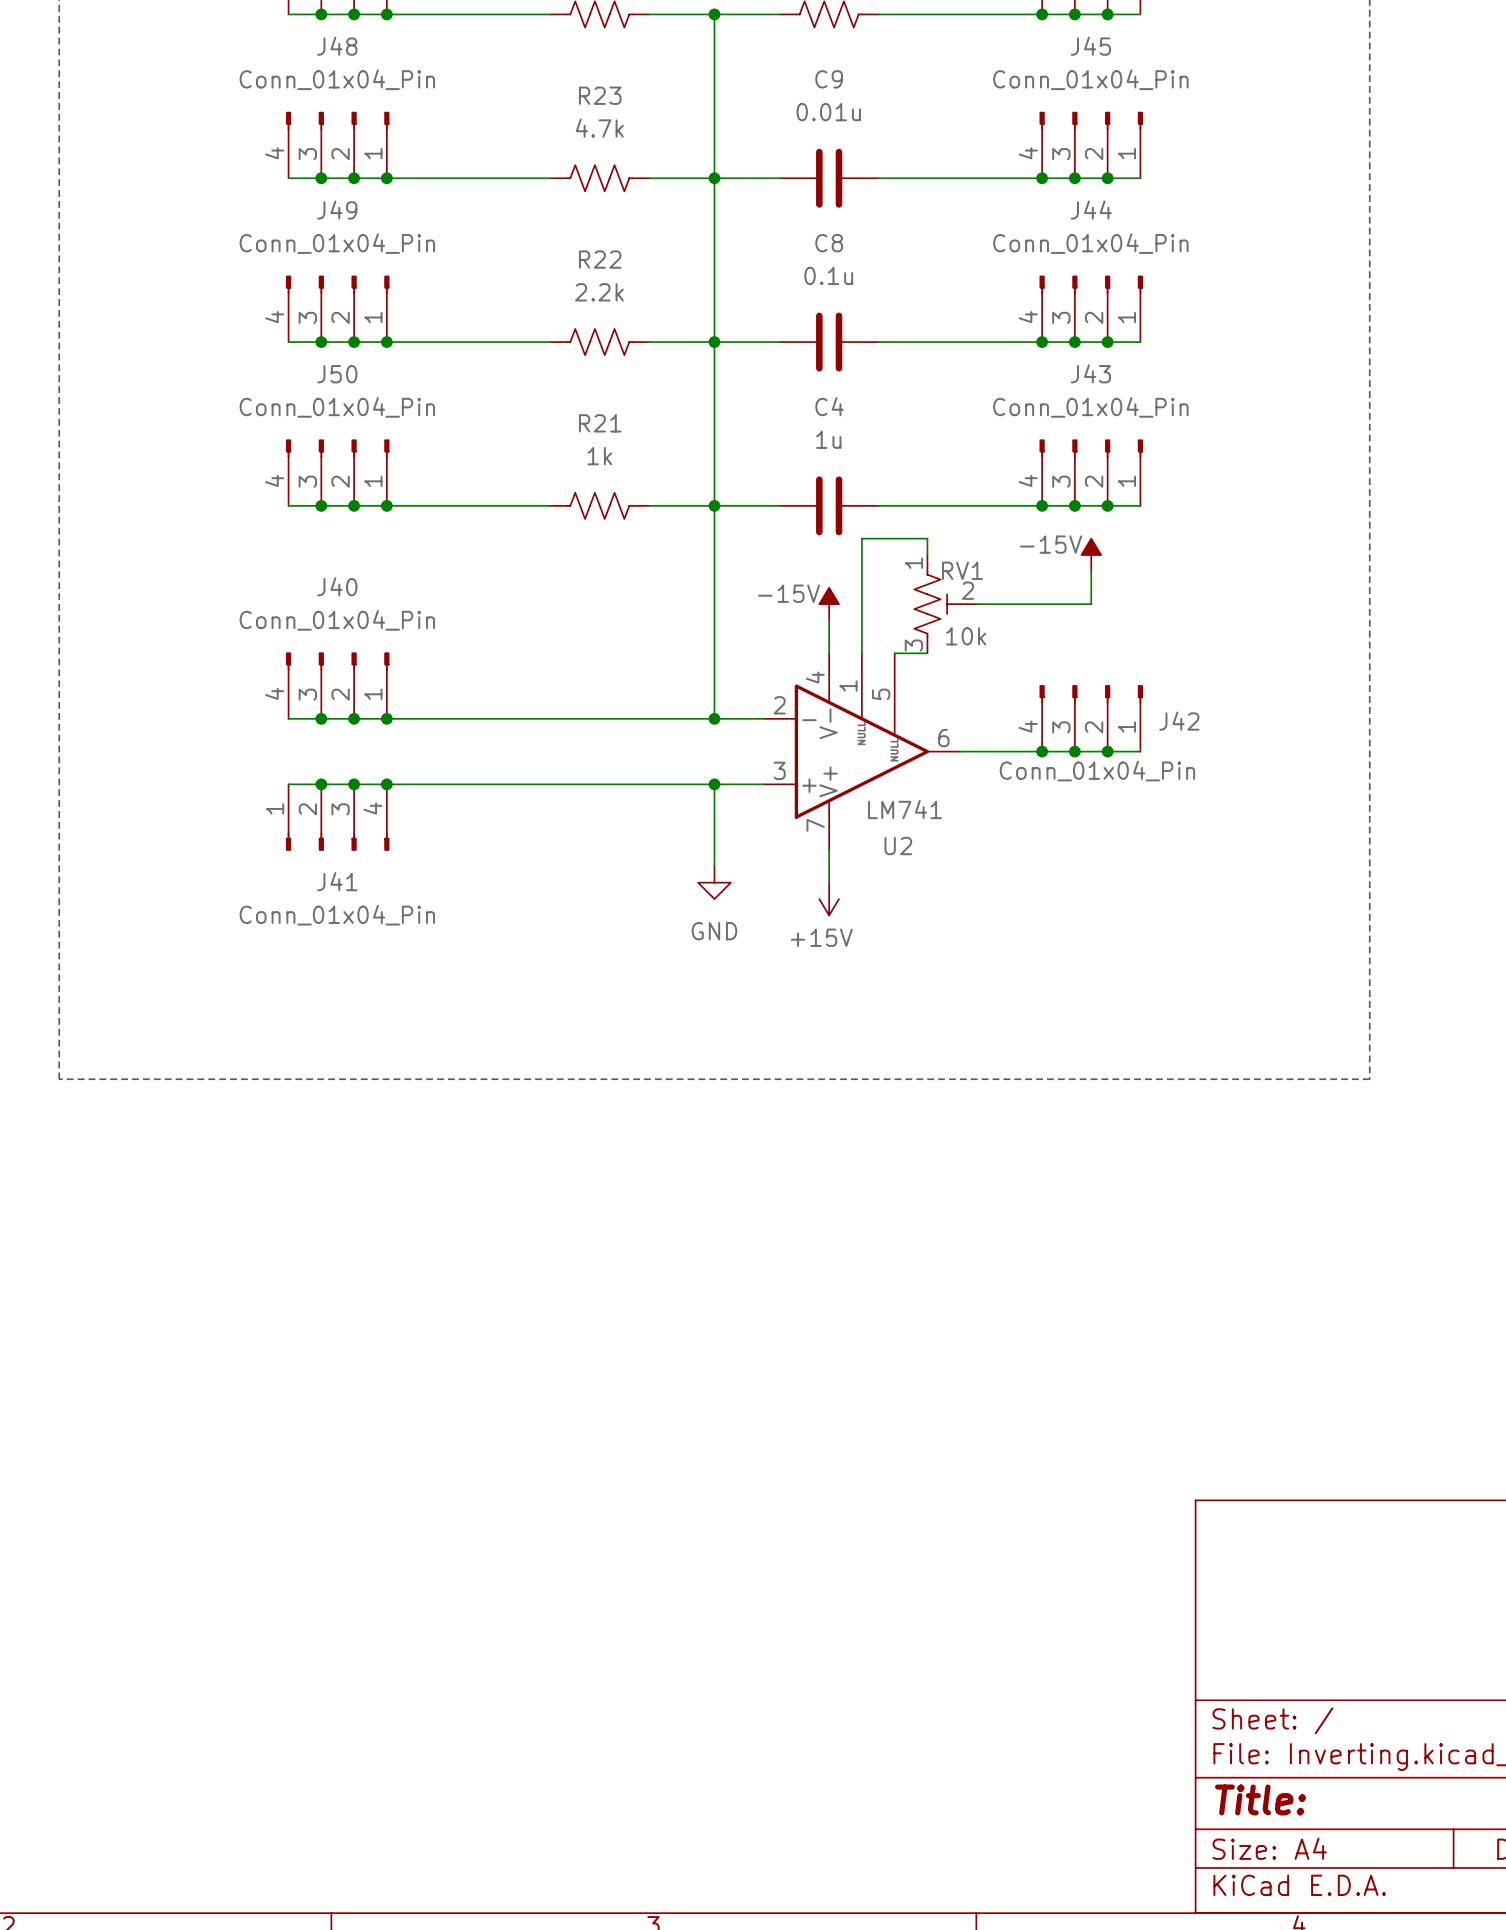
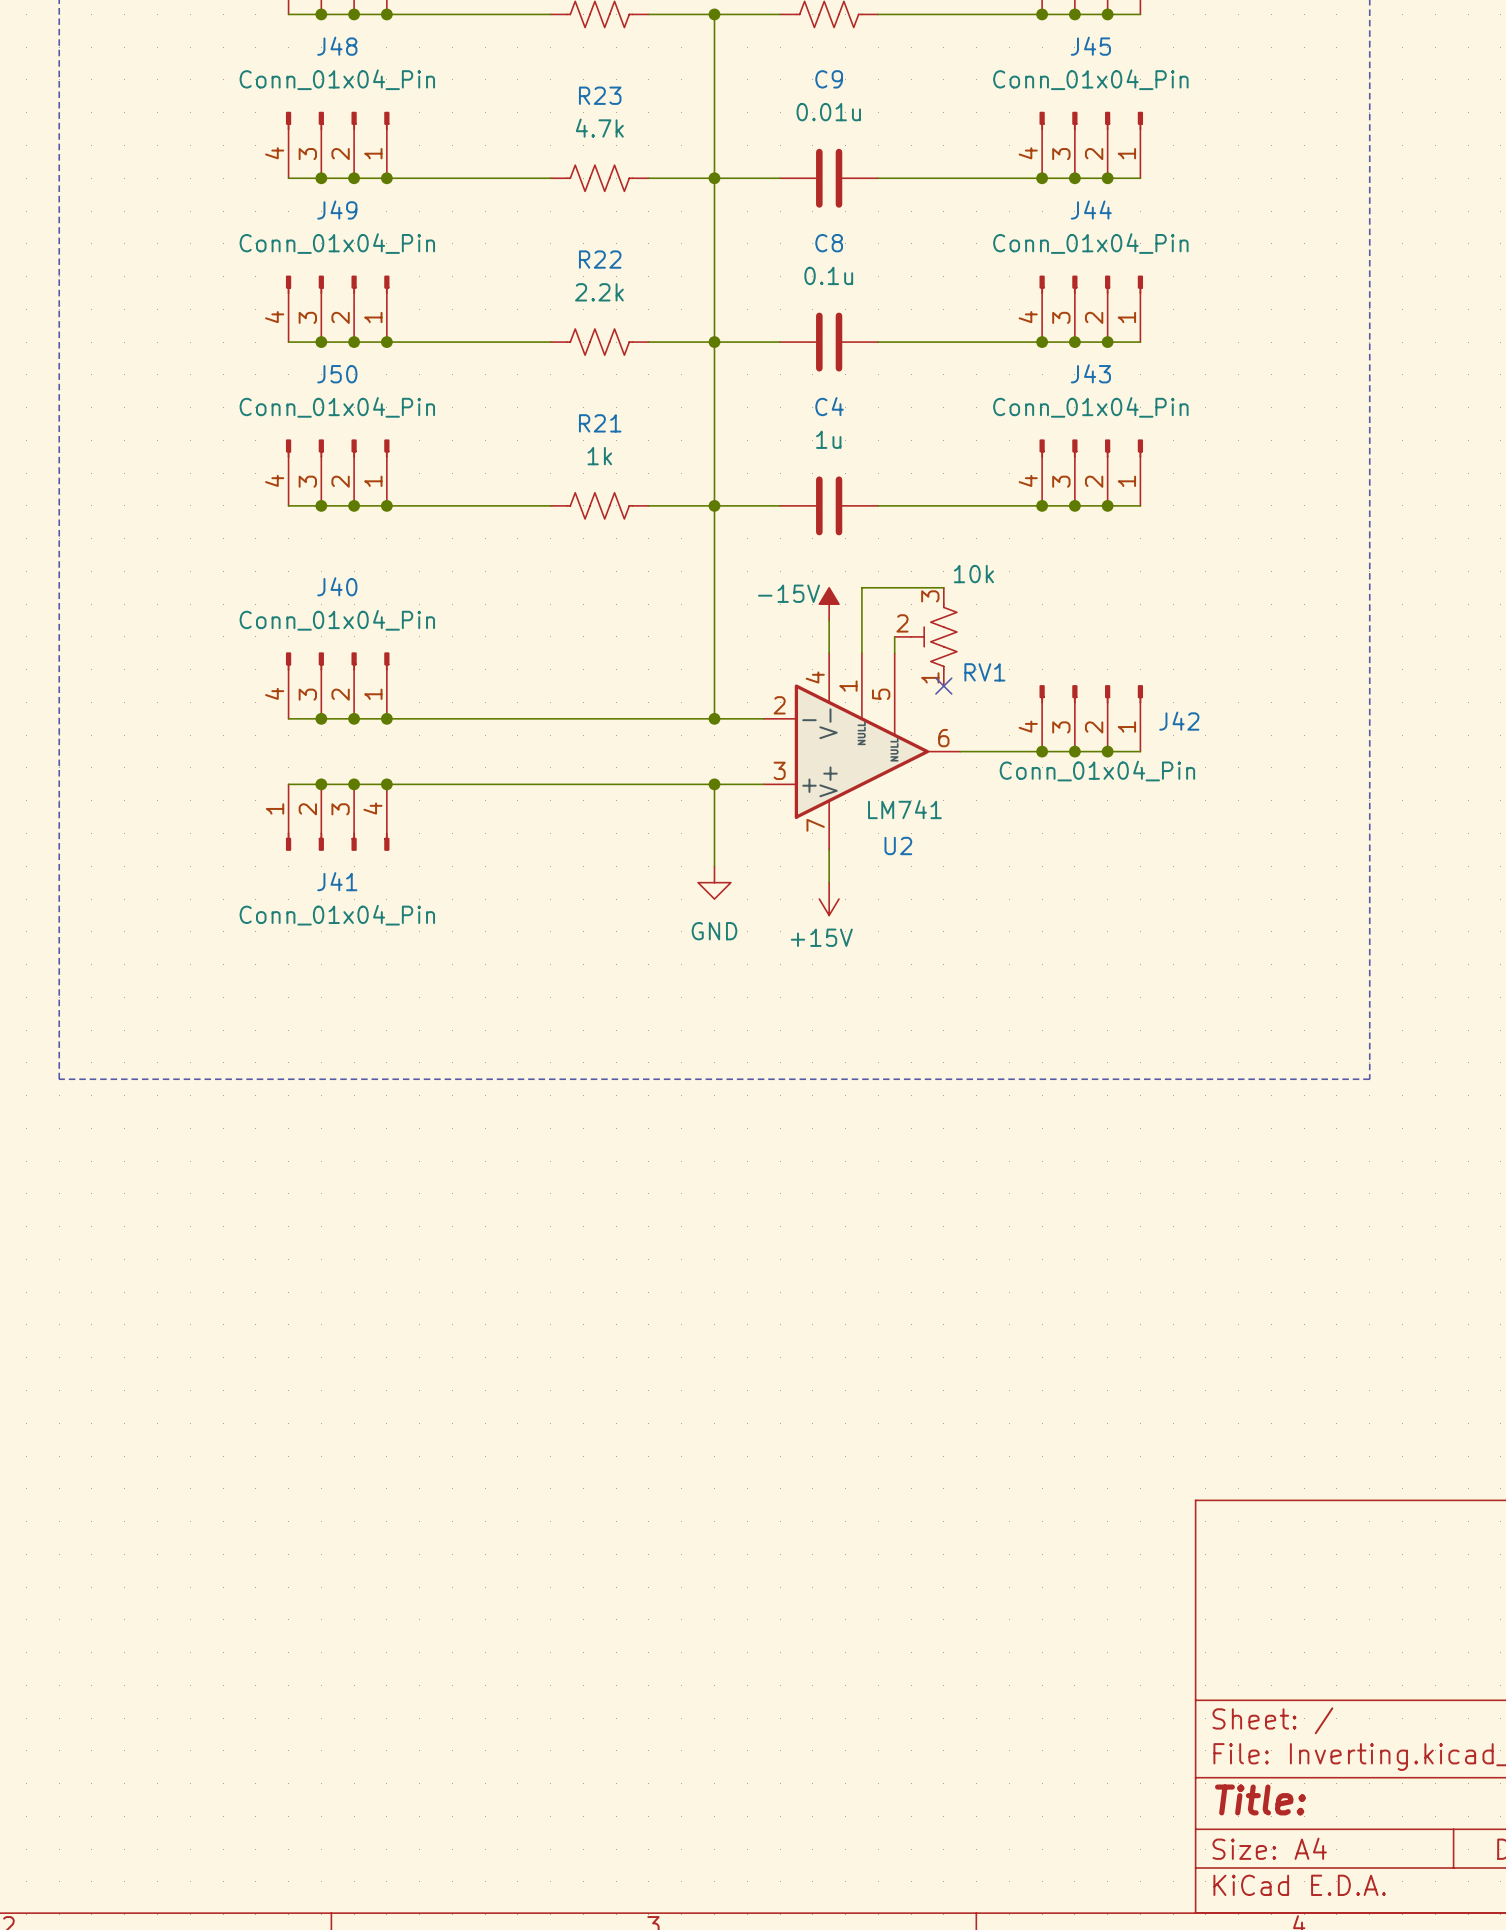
wire: (927, 555) (927, 538) (861, 538) (861, 587) -> (943, 587) (861, 587)
power symbol: -15V (1091, 555) -> none
RV1 name position: RV1 (962, 570) -> RV1 (984, 672)
wire: (1091, 571) (1091, 604) (976, 604) -> none
RV1 rotation: 0° (937, 604) -> 180° (933, 636)
RV1 value position: 10k (966, 636) -> 10k (973, 574)
wire: (894, 653) (927, 653) -> (894, 653) (894, 636)
no-connect mark: none -> (943, 686)

